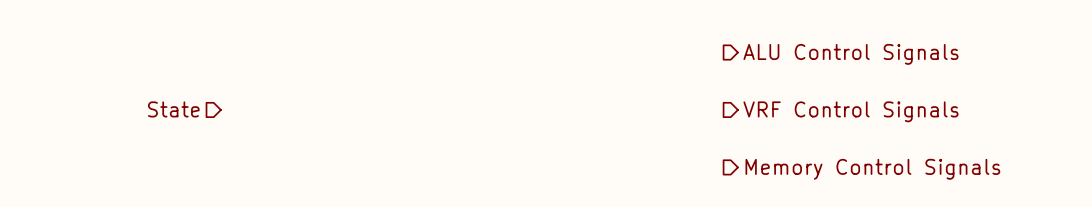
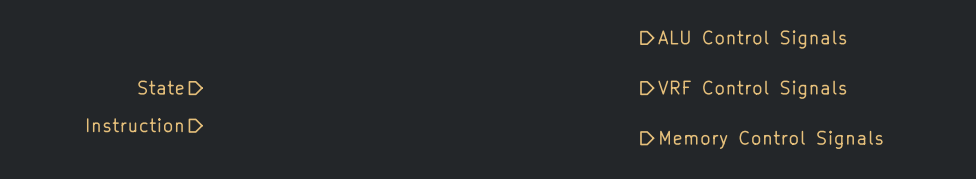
hierarchical label: none -> Instruction (134, 125)

